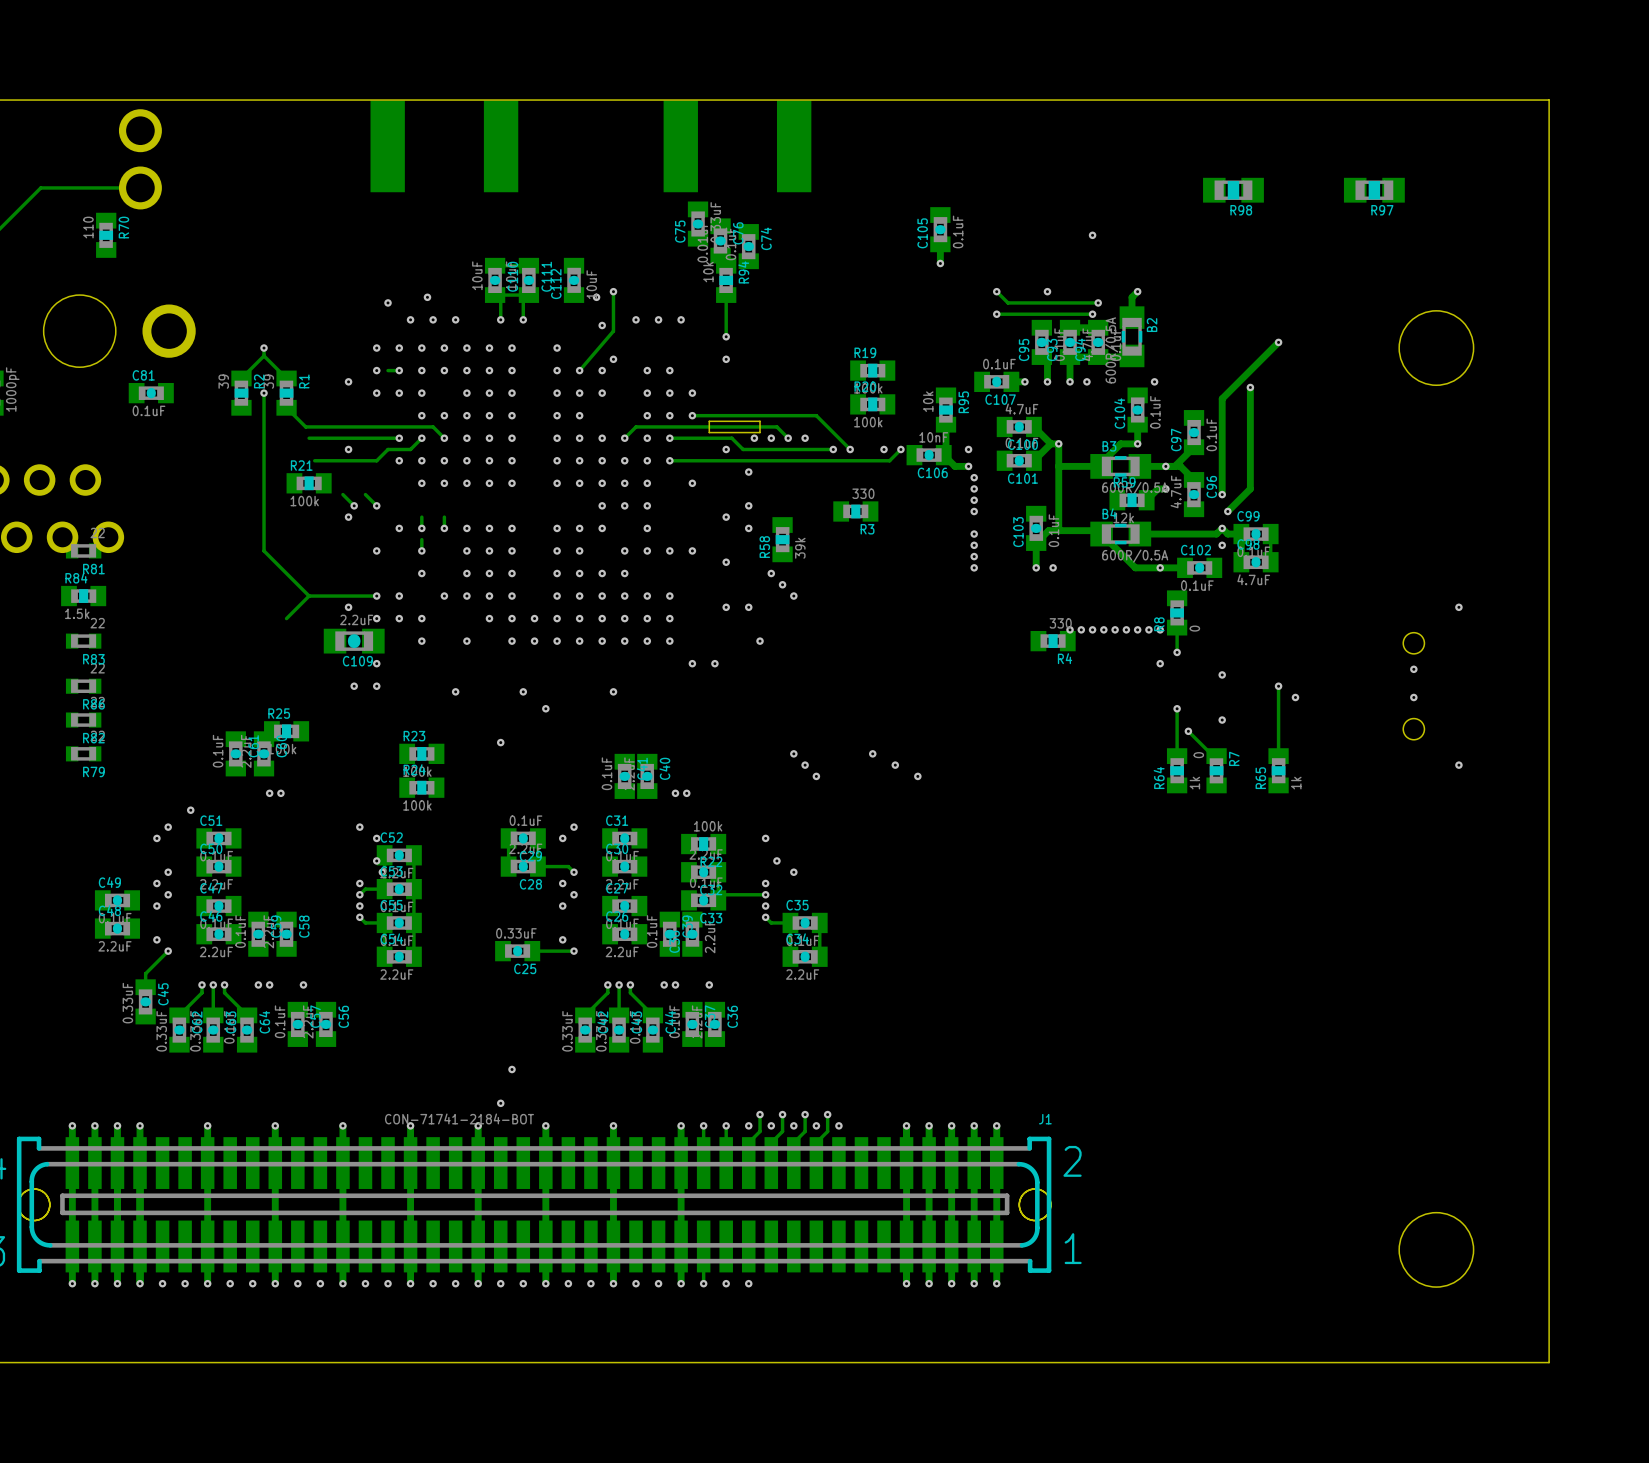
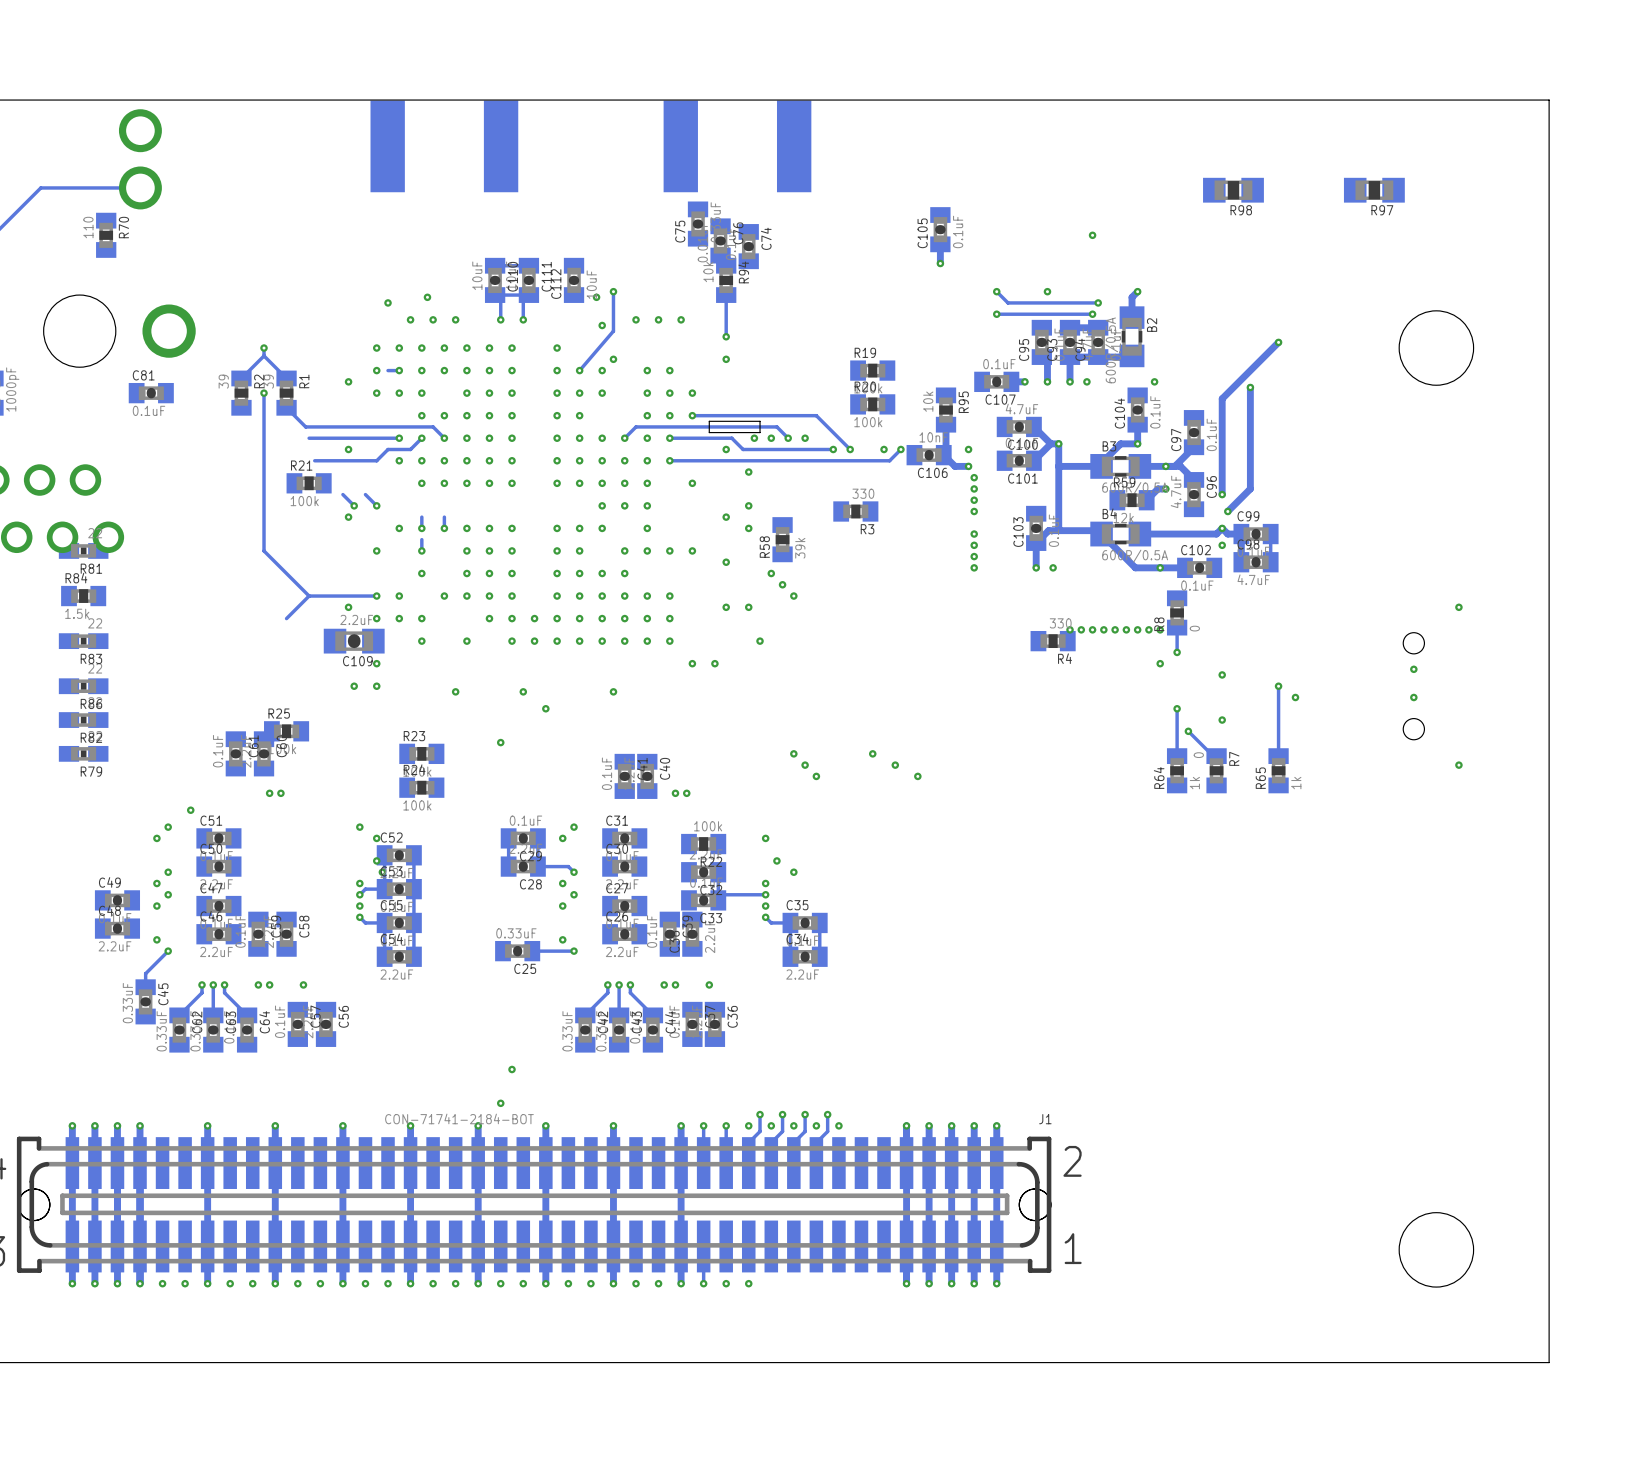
R81 footprint: [65, 543, 102, 559] -> [58, 543, 109, 559]
R83 footprint: [65, 633, 102, 649] -> [58, 633, 109, 650]
R86 footprint: [65, 678, 102, 694] -> [58, 678, 109, 695]
R82 footprint: [65, 712, 102, 728] -> [58, 712, 109, 728]
R79 footprint: [65, 746, 102, 762] -> [58, 745, 109, 762]

